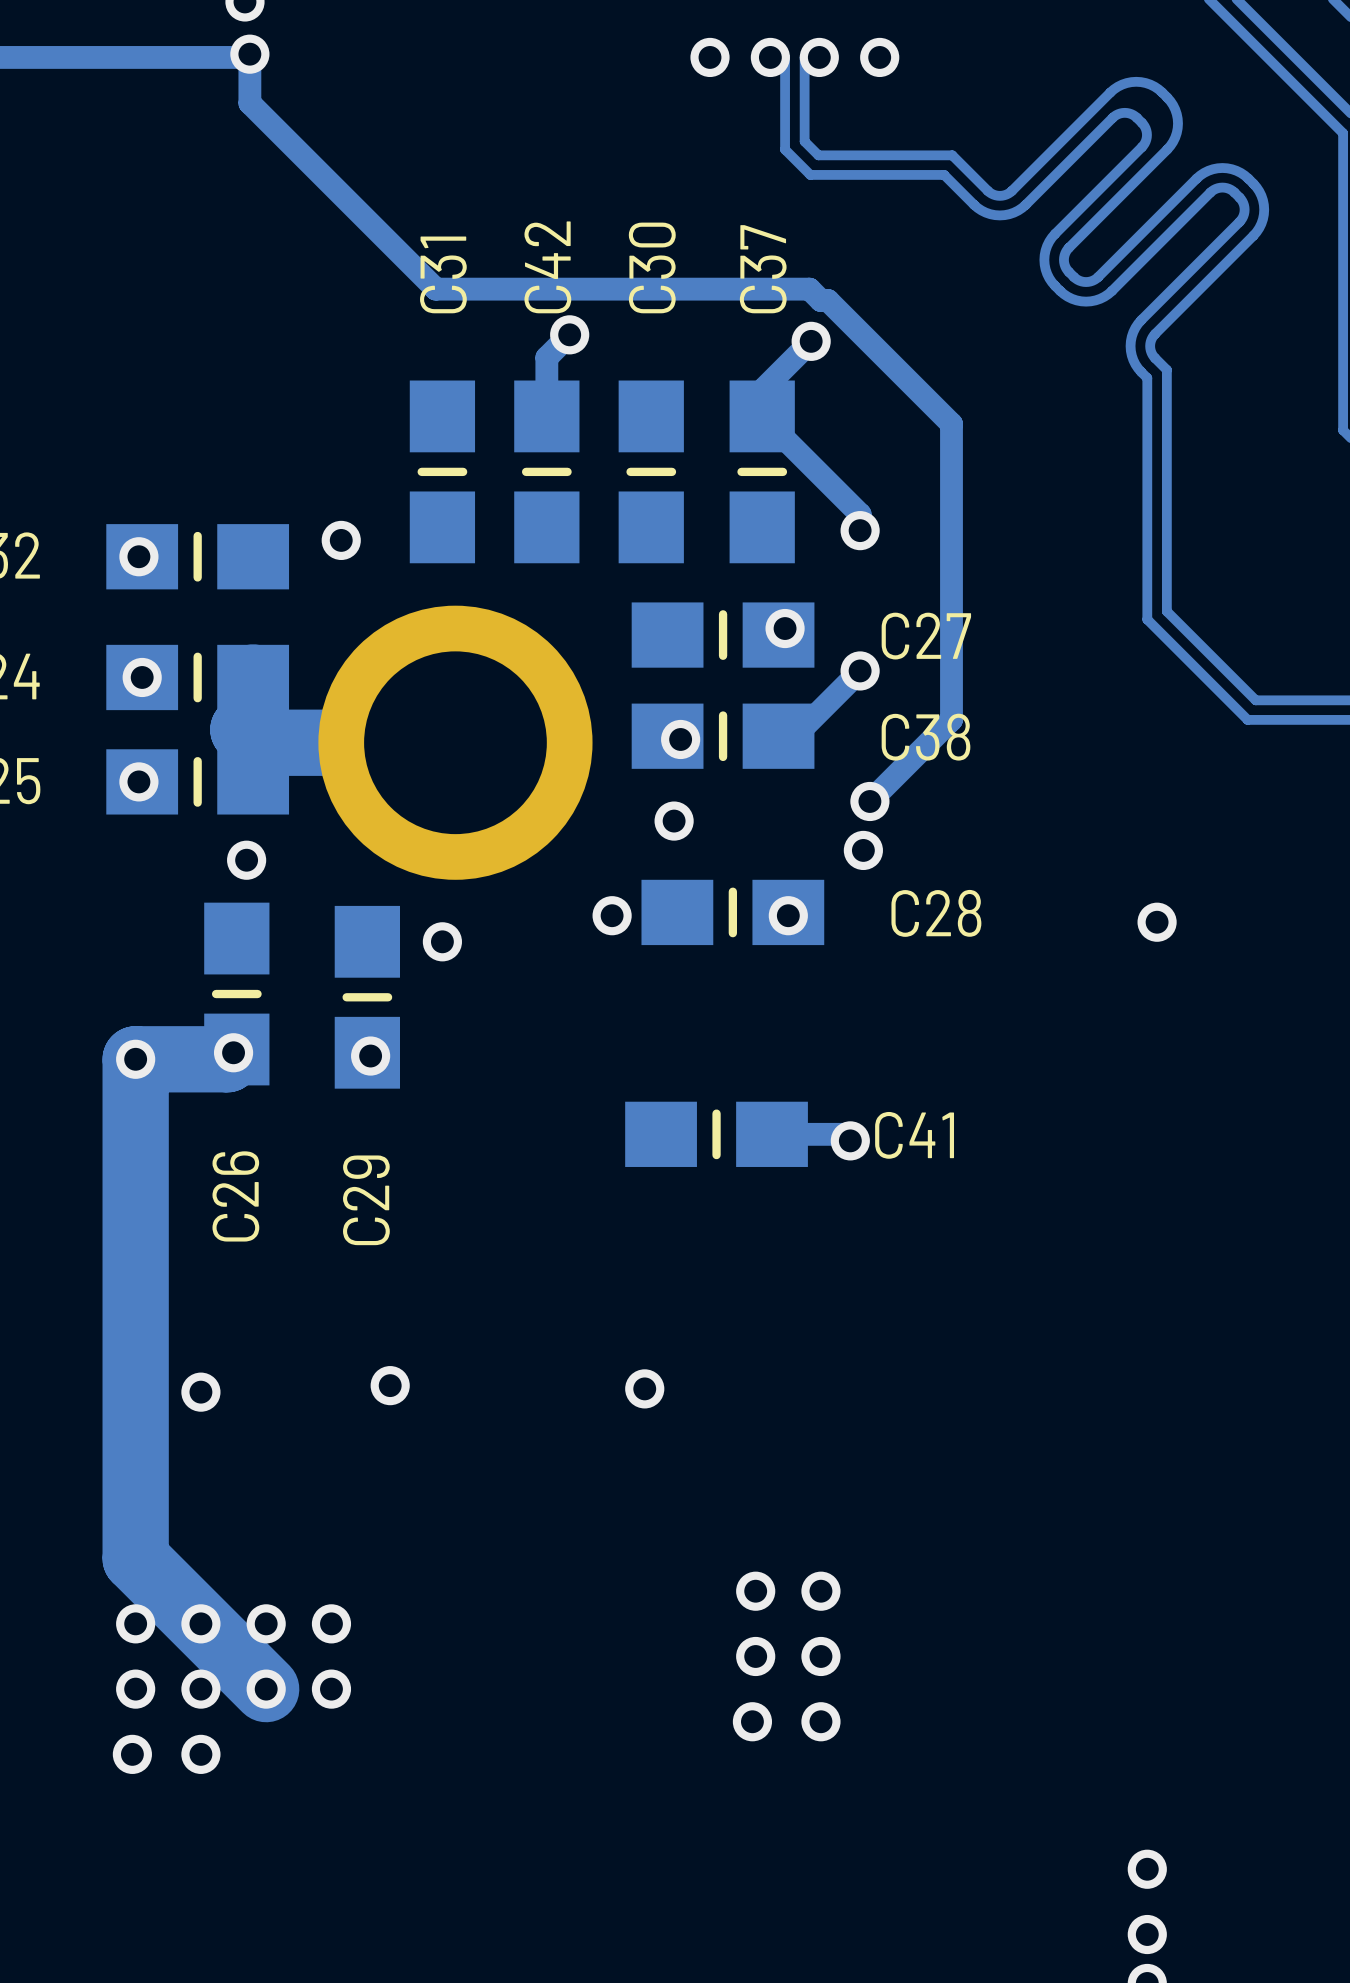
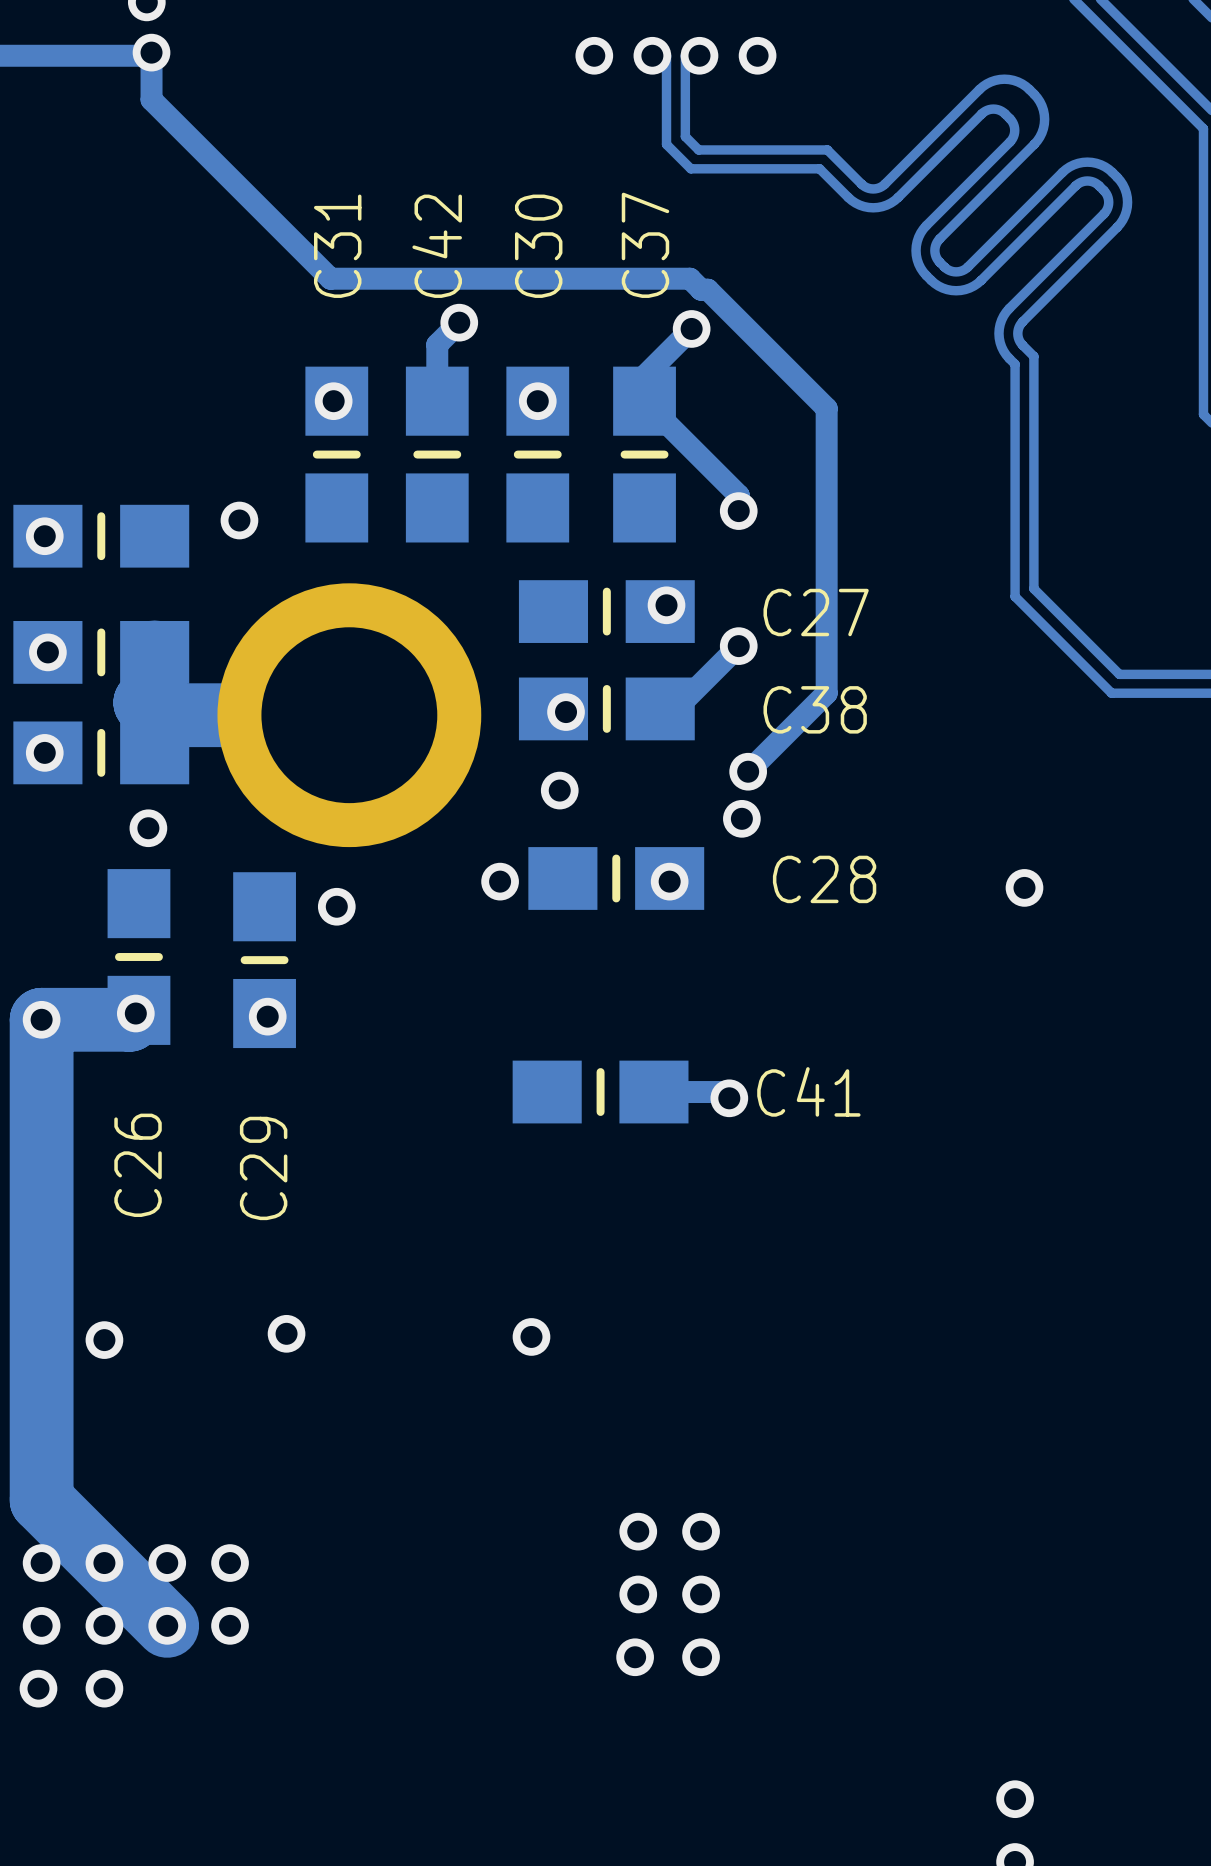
via: none -> (333, 401)
via: none -> (537, 401)

